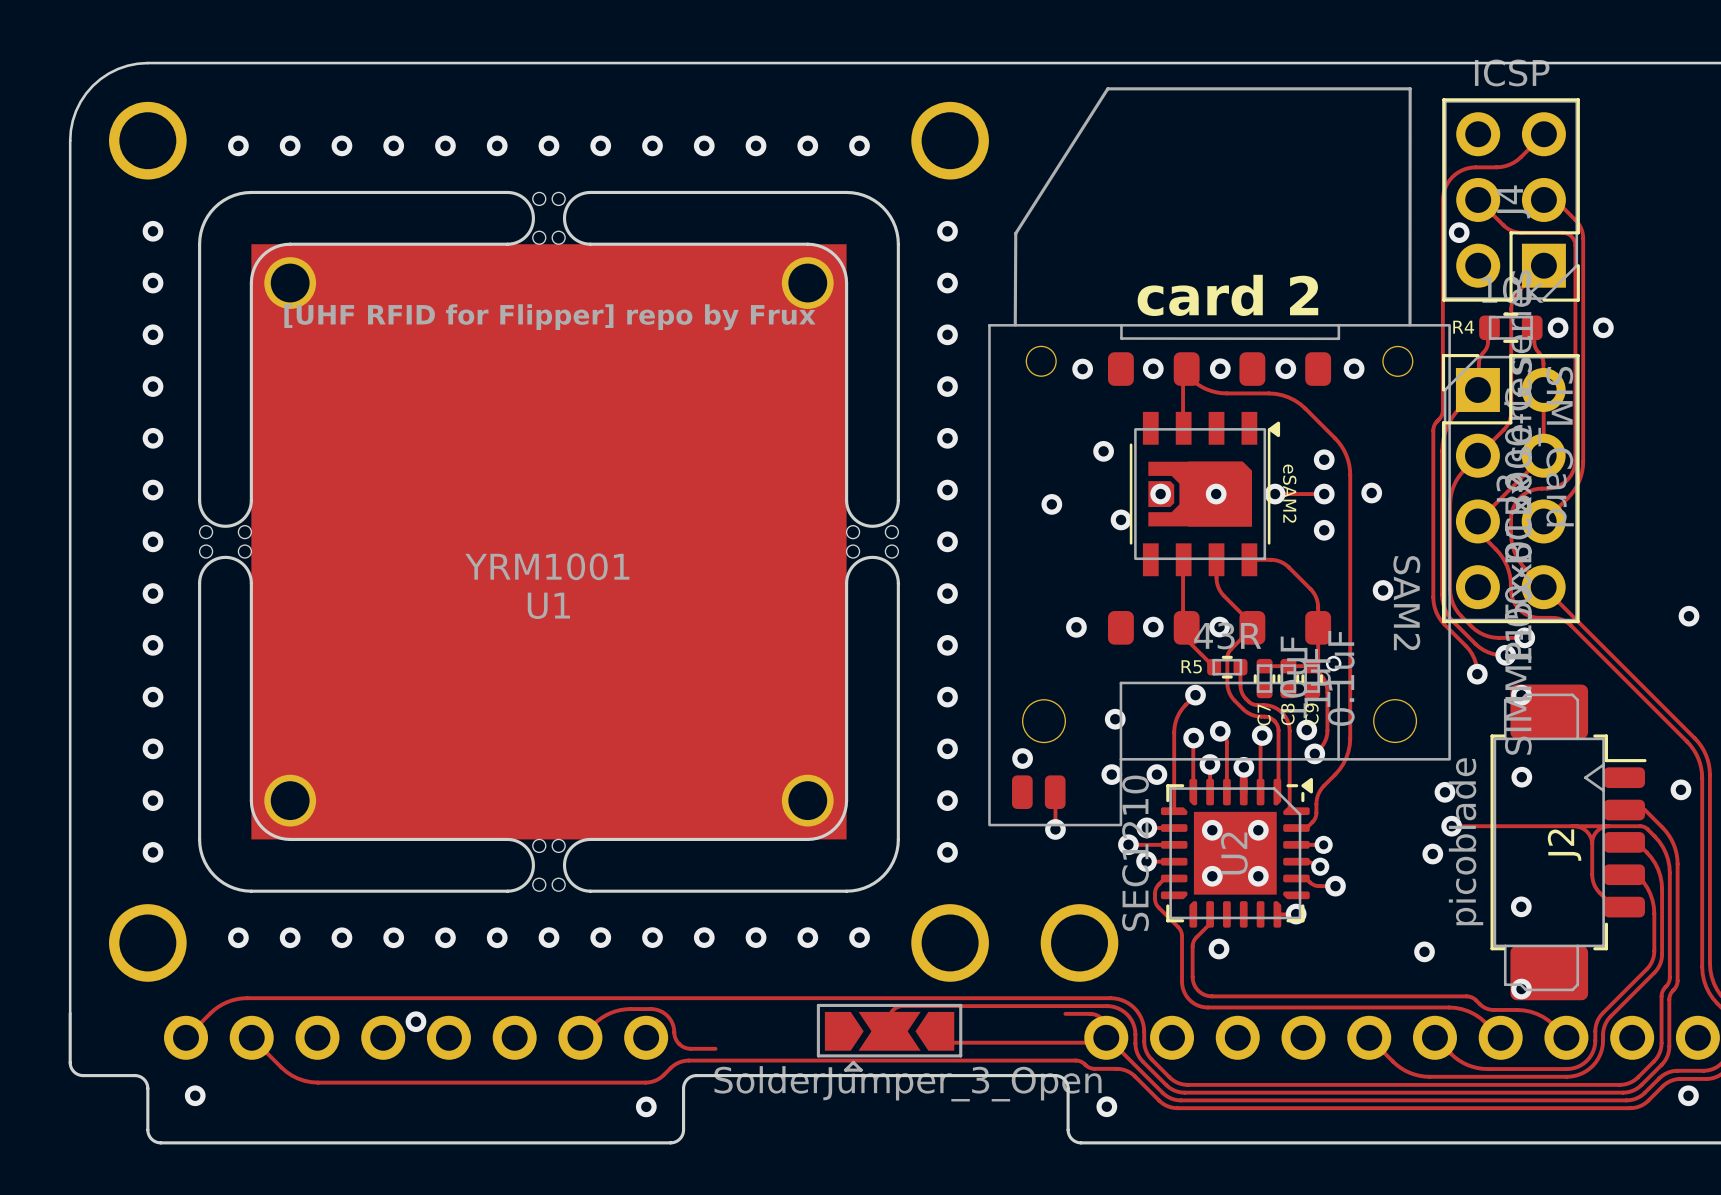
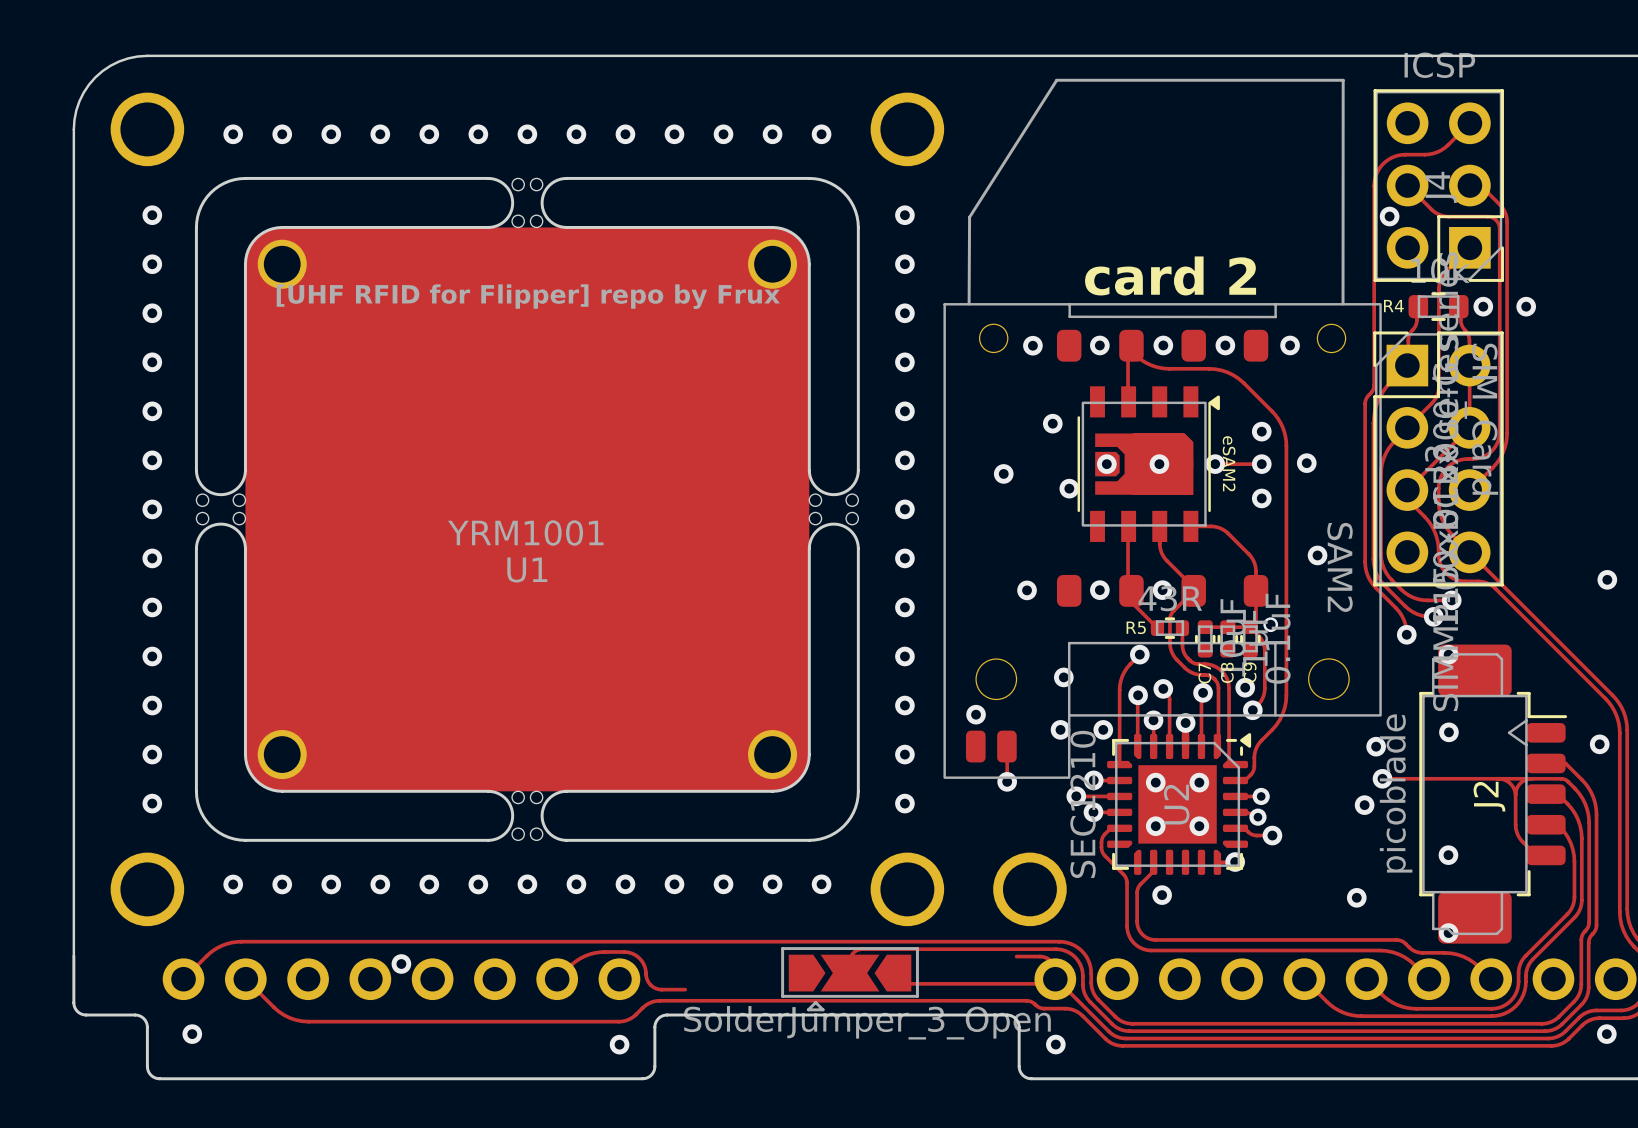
U1 footprint: [109, 101, 1119, 982] -> [110, 92, 1067, 927]

